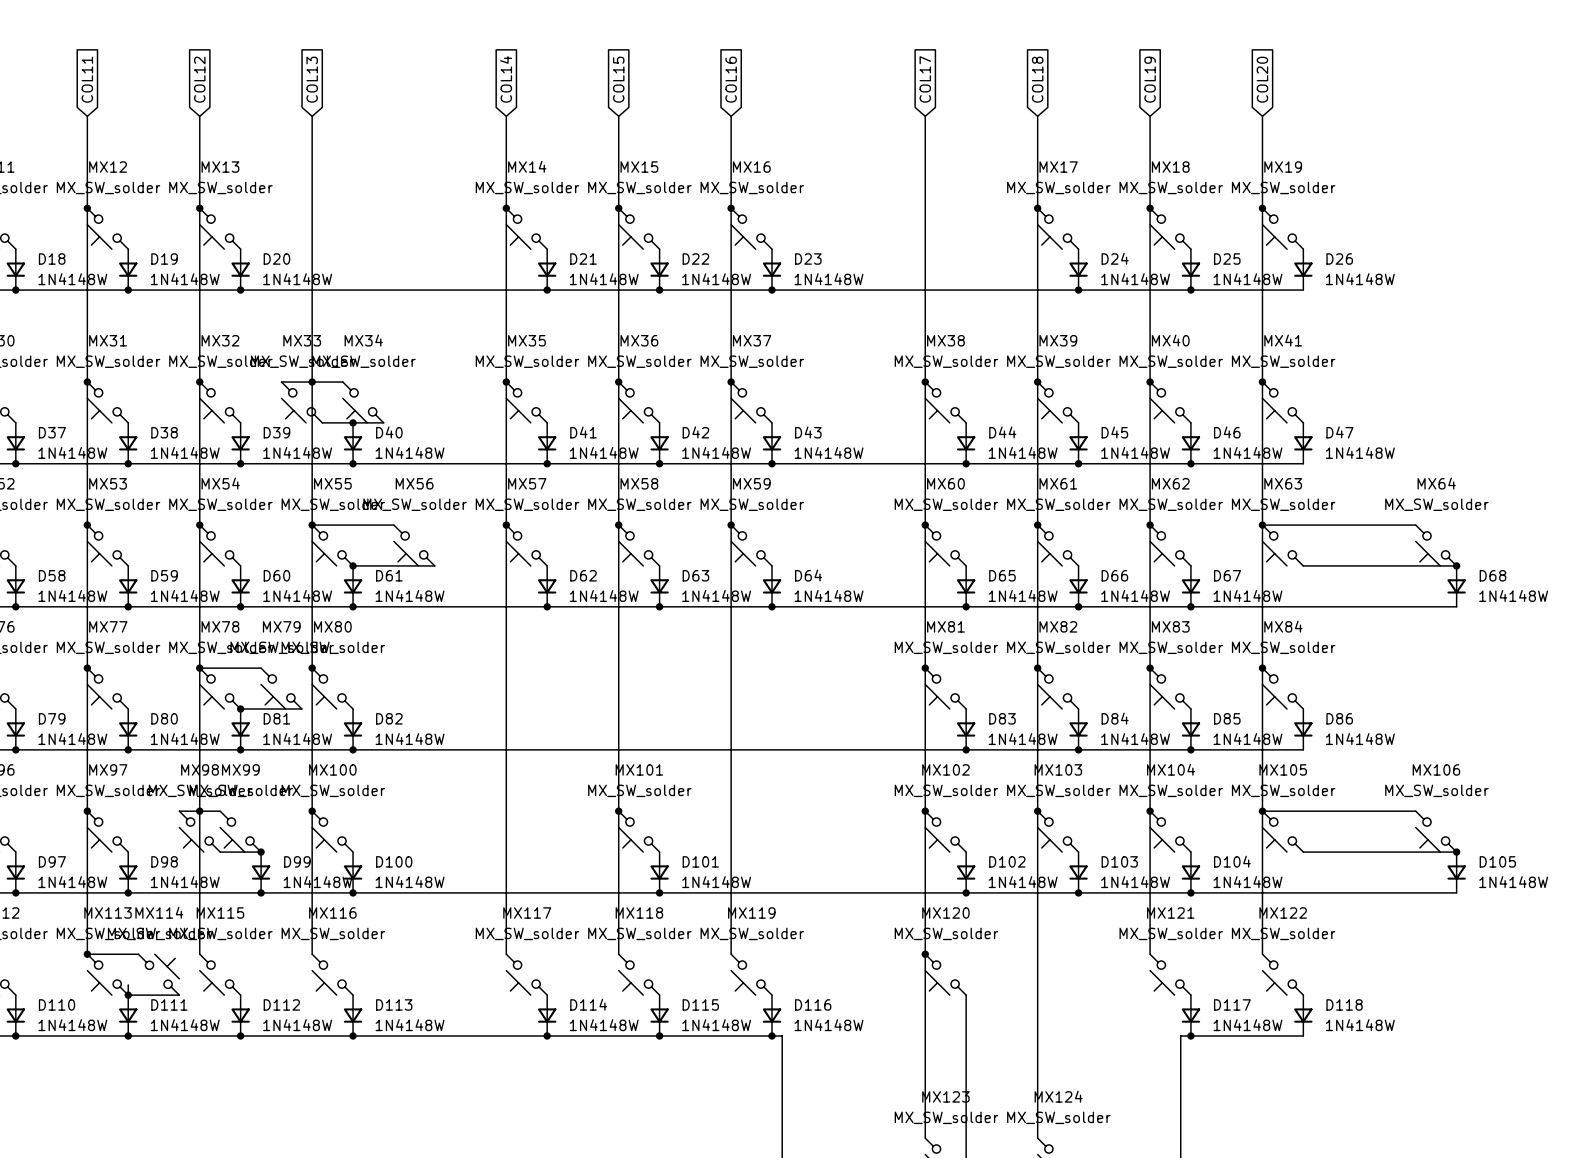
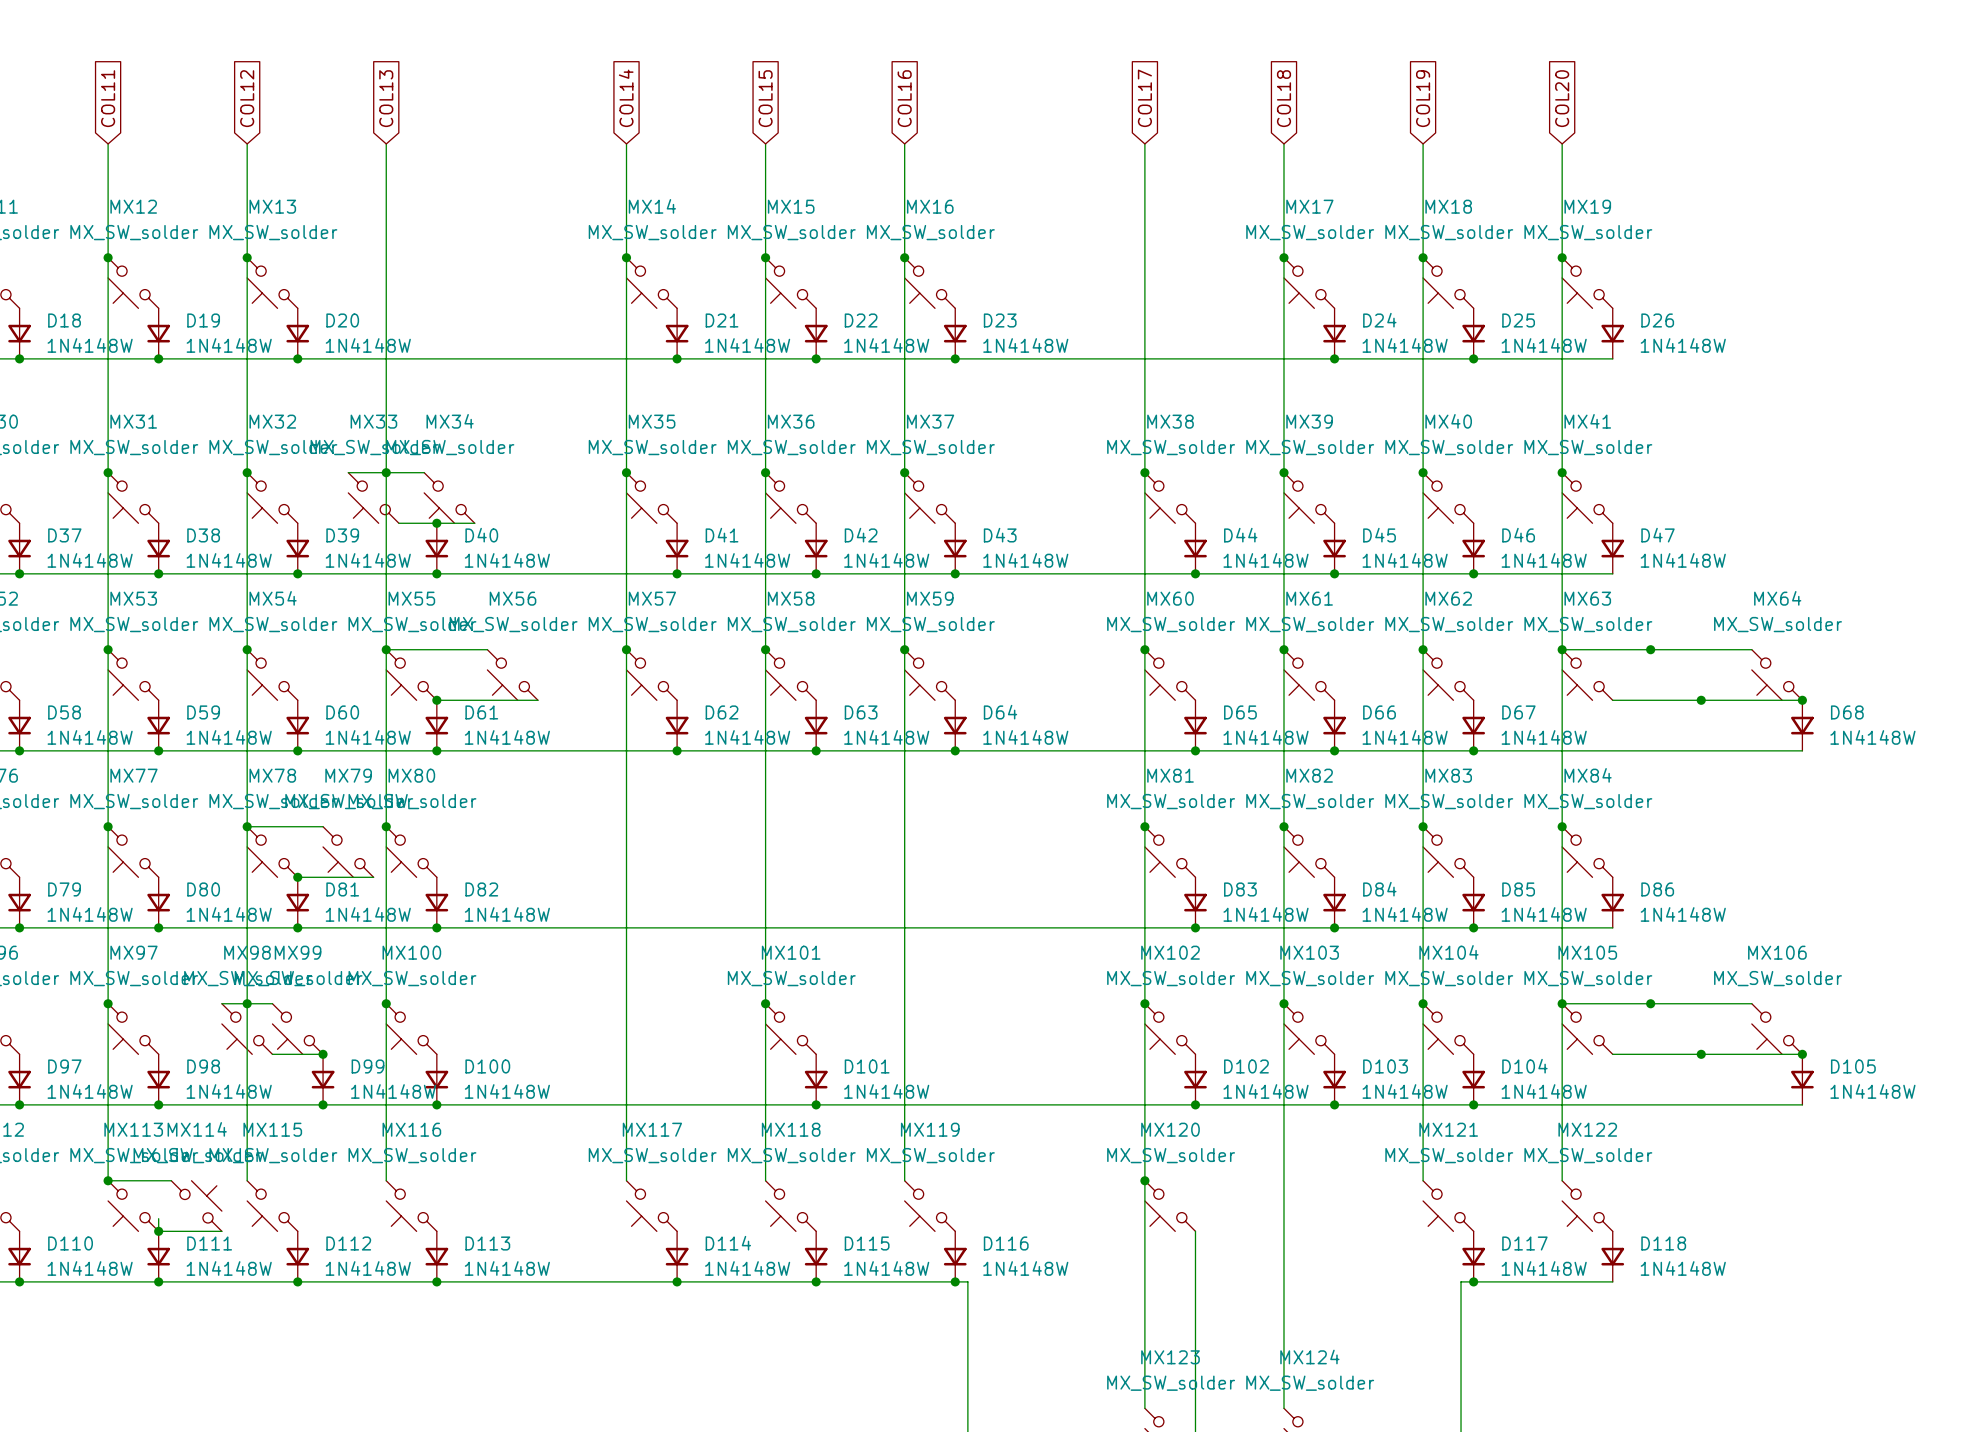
junction: none -> (1650, 649)
junction: none -> (1701, 700)
junction: none -> (1650, 1003)
junction: none -> (1701, 1054)

